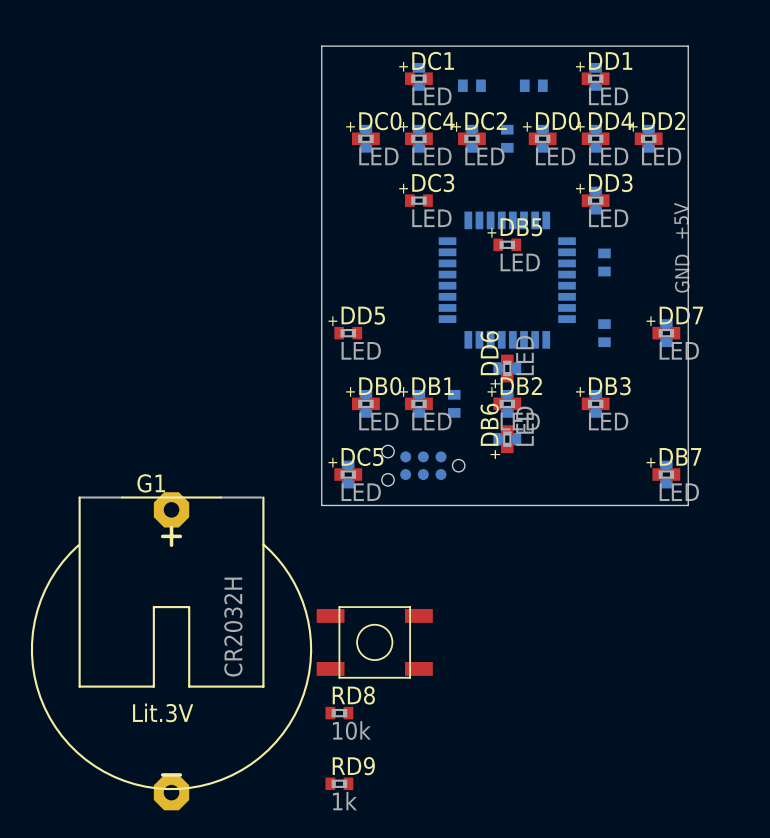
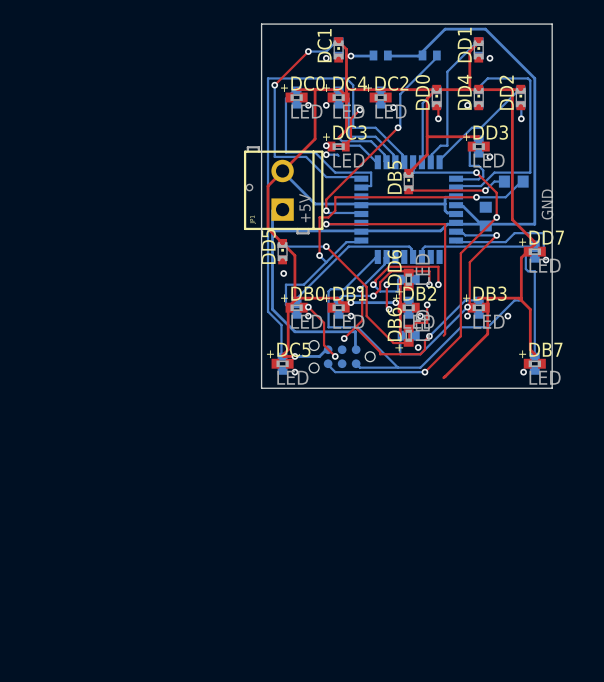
DC1 name position: DC1 (433, 61) -> DC1 (324, 45)
DD1 name position: DD1 (610, 61) -> DD1 (464, 45)
bottom track: none -> (338, 39) (326, 51) (308, 51)
bottom track: none -> (478, 39) (447, 71) (447, 145) (440, 145) (431, 154) (430, 162)
top track: none -> (338, 41) (346, 49) (346, 130) (338, 138)
top track: none -> (478, 41) (469, 51) (469, 89)
DC1 footprint: [405, 72, 433, 85] -> [333, 37, 344, 63]
DD1 footprint: [581, 72, 610, 85] -> [473, 37, 484, 63]
top track: none -> (308, 51) (274, 85)
via: none -> (308, 51)
bottom track: none -> (371, 55) (350, 56)
bottom track: none -> (390, 55) (420, 55) (445, 29) (485, 29) (534, 78) (534, 224) (487, 224) (485, 225)
bottom track: none -> (439, 55) (400, 94) (400, 127) (398, 127)
via: none -> (350, 56)
via: none -> (326, 58)
via: none -> (489, 58)
DC1 value: LED (431, 96) -> none
DD1 value: LED (608, 96) -> none
DD2 name position: DD2 (663, 120) -> DD2 (506, 92)
DD0 name position: DD0 (557, 121) -> DD0 (422, 92)
DD4 name position: DD4 (611, 121) -> DD4 (464, 92)
bottom track: none -> (274, 85) (274, 156) (306, 156) (326, 177) (359, 177) (361, 178)
via: none -> (274, 85)
bottom track: none -> (296, 88) (285, 98) (285, 152) (315, 152) (335, 172) (371, 172) (371, 186) (361, 187)
bottom track: none -> (338, 88) (348, 98) (348, 136) (375, 136) (393, 154) (393, 161) (395, 162)
bottom track: none -> (436, 88) (422, 103) (421, 162)
bottom track: none -> (478, 88) (487, 78) (528, 78) (530, 80) (530, 172) (494, 172) (481, 186) (456, 187)
bottom track: none -> (520, 88) (481, 127) (472, 127) (439, 162)
top track: none -> (296, 89) (338, 89) (346, 96)
top track: none -> (315, 89) (315, 138) (268, 186) (268, 228) (294, 255) (294, 298) (296, 299)
top track: none -> (346, 89) (436, 89)
top track: none -> (436, 89) (427, 98) (427, 154) (408, 173)
top track: none -> (512, 89) (512, 219) (534, 242) (521, 257) (520, 299)
top track: none -> (520, 89) (436, 89)
DD0 footprint: [528, 132, 557, 146] -> [431, 84, 442, 111]
DD4 footprint: [581, 132, 610, 146] -> [473, 84, 484, 111]
DD2 footprint: [634, 132, 663, 146] -> [515, 84, 526, 111]
part: (507, 138) -> none
via: none -> (308, 105)
via: none -> (326, 105)
via: none -> (467, 105)
top track: none -> (436, 105) (438, 118)
bottom track: none -> (520, 106) (521, 118)
via: none -> (393, 107)
top track: none -> (359, 109) (350, 118) (350, 138) (344, 145) (326, 145)
via: none -> (359, 109)
DD0 value: LED (555, 156) -> none
DD4 value: LED (608, 156) -> none
DD2 value: LED (661, 156) -> none
via: none -> (438, 118)
via: none -> (521, 118)
top track: none -> (398, 127) (326, 199) (326, 210)
via: none -> (398, 127)
bottom track: none -> (338, 137) (342, 141) (371, 141) (384, 154) (384, 161) (386, 162)
top track: none -> (427, 136) (478, 136) (478, 138)
bottom track: none -> (478, 137) (469, 147) (469, 165) (478, 165) (483, 170) (483, 177) (478, 179) (456, 178)
bottom track: none -> (326, 145) (359, 145) (377, 162)
via: none -> (326, 145)
bottom track: none -> (326, 154) (338, 155)
via: none -> (326, 154)
via: none -> (489, 156)
bottom track: none -> (404, 162) (402, 161) (402, 154) (375, 127) (353, 127) (353, 85) (346, 78) (268, 78) (268, 311) (281, 325) (282, 354)
bottom track: none -> (413, 162) (413, 172) (476, 172)
text position: +5V (681, 220) -> +5V (305, 208)
DB5 name position: DB5 (521, 227) -> DB5 (394, 177)
bottom track: none -> (282, 170) (315, 204) (445, 204)
top track: none -> (476, 172) (496, 192) (496, 217) (460, 253) (460, 336) (424, 372)
via: none -> (476, 172)
DB5 footprint: [493, 238, 522, 252] -> [403, 168, 414, 195]
bottom track: none -> (504, 181) (494, 181) (485, 190)
part: none -> (513, 181)
bottom track: none -> (523, 181) (505, 197) (476, 197)
part: none -> (283, 190)
top track: none -> (408, 189) (485, 190)
via: none -> (485, 190)
DB5 value: LED (520, 262) -> none
part: (604, 262) -> none
bottom track: none -> (456, 196) (445, 197) (445, 210) (447, 212) (456, 212)
top track: none -> (476, 197) (335, 197) (335, 210) (328, 217) (319, 217) (319, 255)
via: none -> (476, 197)
bottom track: none -> (456, 205) (463, 206) (481, 224) (485, 225)
bottom track: none -> (282, 209) (272, 210) (272, 309) (294, 331) (355, 331) (356, 349)
bottom track: none -> (326, 210) (328, 212) (361, 214)
via: none -> (326, 210)
part: none -> (485, 216)
via: none -> (496, 217)
top track: none -> (326, 224) (445, 224) (443, 335)
via: none -> (326, 224)
bottom track: none -> (485, 225) (485, 224) (456, 222) (447, 224) (440, 230) (272, 230)
bottom track: none -> (456, 231) (465, 235) (496, 235)
top track: none -> (496, 235) (469, 262) (469, 304) (467, 307)
via: none -> (496, 235)
DD5 name position: DD5 (363, 315) -> DD5 (268, 246)
bottom track: none -> (361, 240) (346, 242) (303, 284) (285, 284) (285, 304) (288, 307) (308, 307)
bottom track: none -> (456, 240) (456, 242) (505, 242) (514, 233) (543, 233) (543, 251) (525, 251) (525, 269) (528, 271) (534, 271) (534, 354)
bottom track: none -> (282, 242) (285, 246) (326, 246)
bottom track: none -> (534, 242) (532, 246) (424, 246) (422, 248) (421, 256)
DD5 footprint: [334, 326, 363, 340] -> [277, 238, 288, 265]
top track: none -> (326, 246) (366, 286) (366, 316) (393, 343) (409, 343) (409, 329) (415, 322) (427, 322) (427, 304)
via: none -> (326, 246)
part: (604, 333) -> none
bottom track: none -> (319, 255) (326, 262)
via: none -> (319, 255)
bottom track: none -> (377, 256) (344, 289) (330, 289) (328, 291) (328, 327) (357, 327) (398, 367)
bottom track: none -> (386, 256) (384, 257) (384, 264) (359, 289)
bottom track: none -> (413, 256) (409, 246) (348, 246) (296, 298)
via: none -> (546, 260)
DD5 value: LED (361, 350) -> none
via: none -> (283, 273)
bottom track: none -> (399, 279) (398, 291) (380, 291) (373, 284)
top track: none -> (400, 279) (400, 335)
top track: none -> (373, 284) (389, 266) (438, 266) (438, 284)
via: none -> (373, 284)
top track: none -> (386, 284) (386, 307) (389, 309)
via: none -> (386, 284)
top track: none -> (429, 284) (429, 271) (391, 271) (380, 282) (380, 289) (373, 295)
via: none -> (429, 284)
via: none -> (438, 284)
top track: none -> (359, 289) (362, 291) (362, 320) (344, 338)
via: none -> (359, 289)
bottom track: none -> (373, 295) (342, 295) (338, 298)
via: none -> (373, 295)
top track: none -> (487, 298) (487, 334) (443, 377)
bottom track: none -> (478, 298) (478, 300) (465, 300) (429, 336)
bottom track: none -> (520, 298) (514, 300) (487, 327) (460, 327) (420, 367) (359, 367) (356, 363)
top track: none -> (296, 299) (337, 298) (339, 302) (350, 302)
top track: none -> (296, 299) (288, 307) (288, 349) (282, 355) (294, 356)
top track: none -> (478, 299) (520, 299)
top track: none -> (520, 299) (530, 309) (530, 349) (534, 355)
bottom track: none -> (350, 302) (395, 302)
via: none -> (350, 302)
via: none -> (395, 302)
via: none -> (427, 304)
top track: none -> (308, 307) (324, 322) (324, 345) (335, 356)
via: none -> (308, 307)
part: (454, 403) -> none
bottom track: none -> (467, 307) (420, 354) (400, 354) (399, 335)
via: none -> (467, 307)
via: none -> (389, 309)
via: none -> (308, 316)
via: none -> (350, 316)
via: none -> (420, 316)
via: none -> (467, 316)
via: none -> (507, 316)
top track: none -> (355, 327) (380, 351) (380, 354) (420, 354) (424, 349) (424, 340) (429, 336)
via: none -> (429, 336)
via: none -> (344, 338)
via: none -> (418, 347)
bottom track: none -> (328, 349) (319, 356) (294, 356)
via: none -> (294, 356)
via: none -> (335, 356)
bottom track: none -> (328, 363) (335, 372) (424, 372)
via: none -> (294, 372)
via: none -> (424, 372)
via: none -> (523, 372)
part: (374, 642) -> none
G1: CR2032H (171, 651) -> none
RD8: 10k (339, 713) -> none
RD9: 1k (339, 783) -> none

